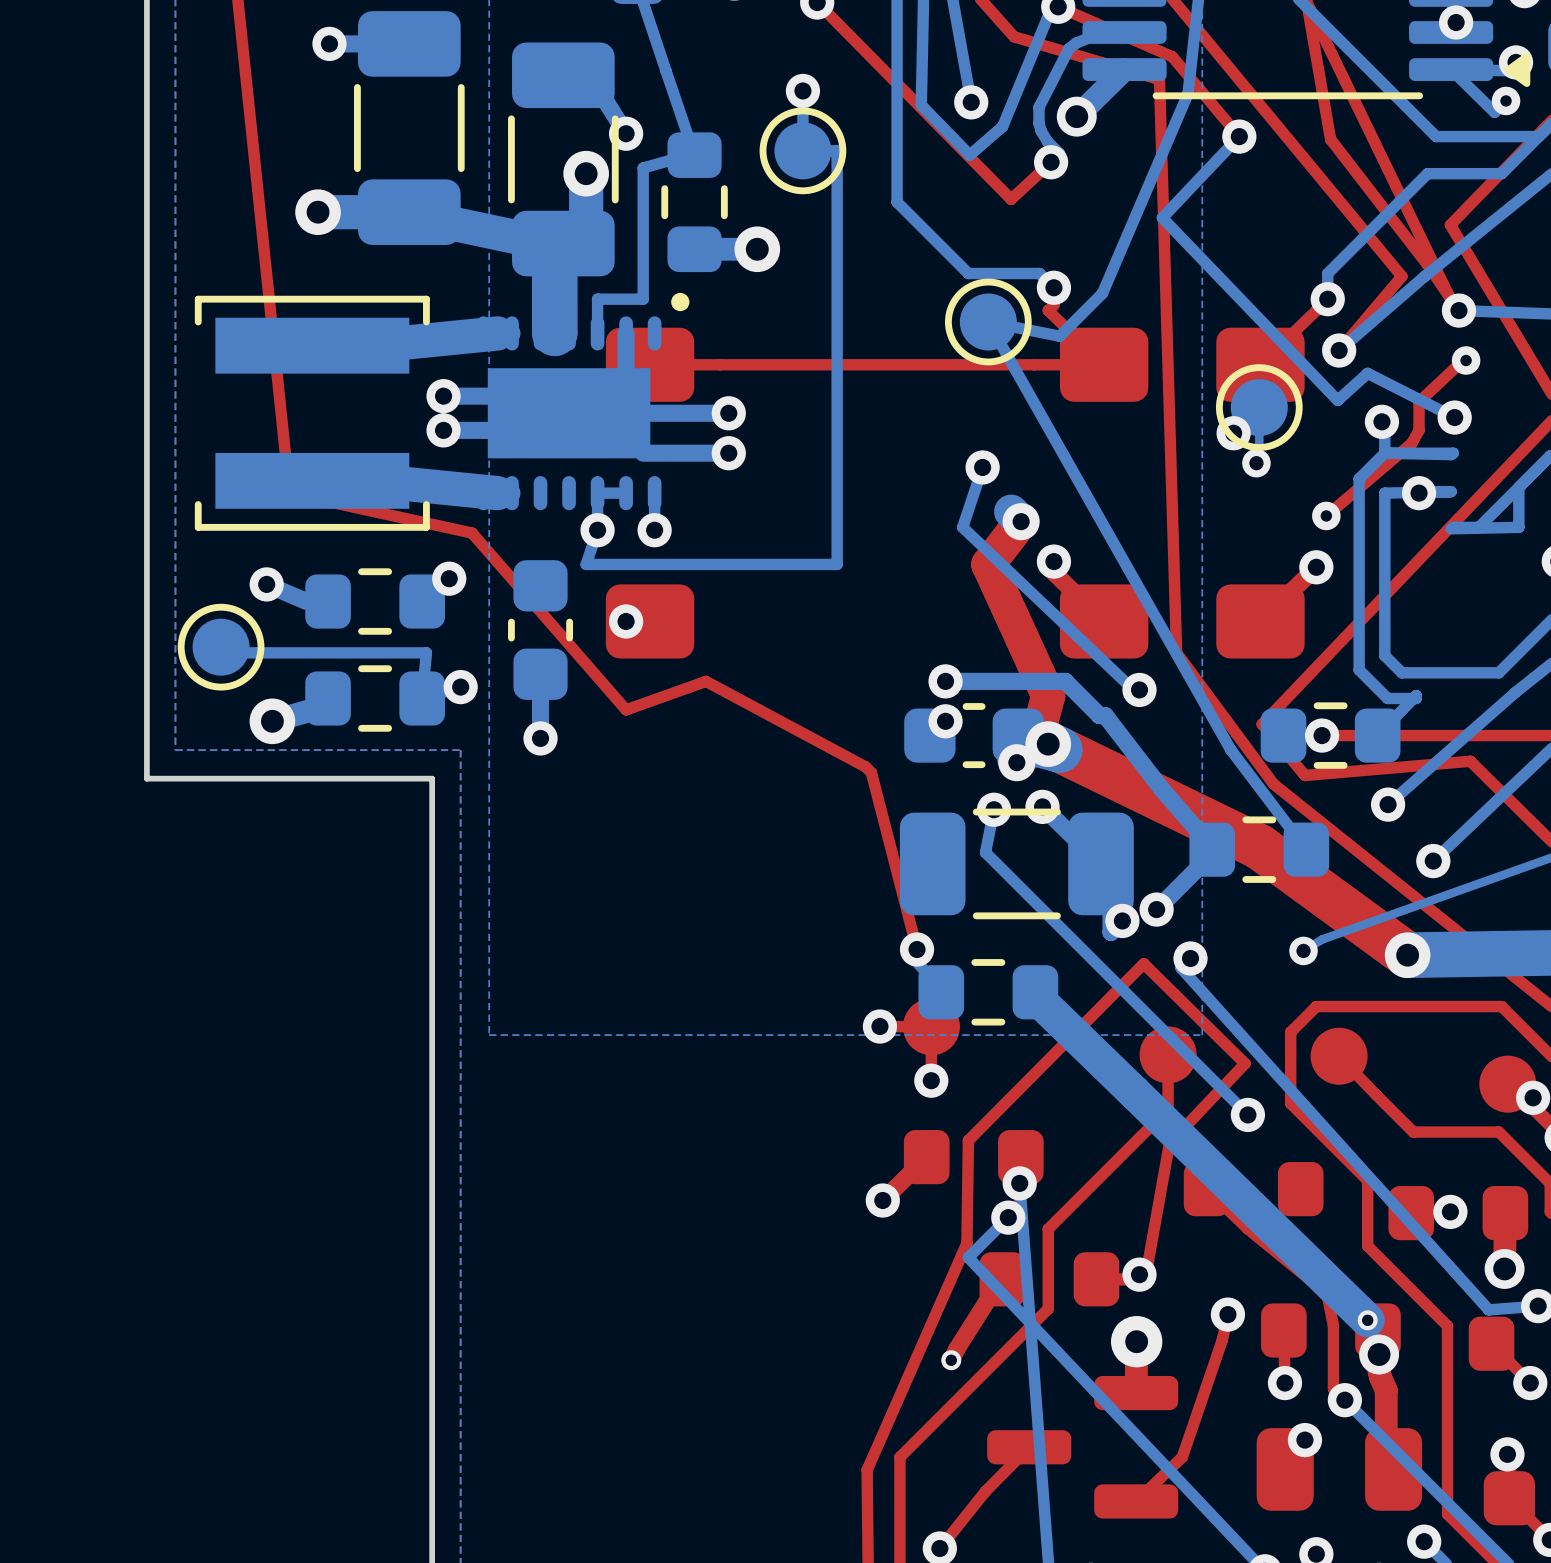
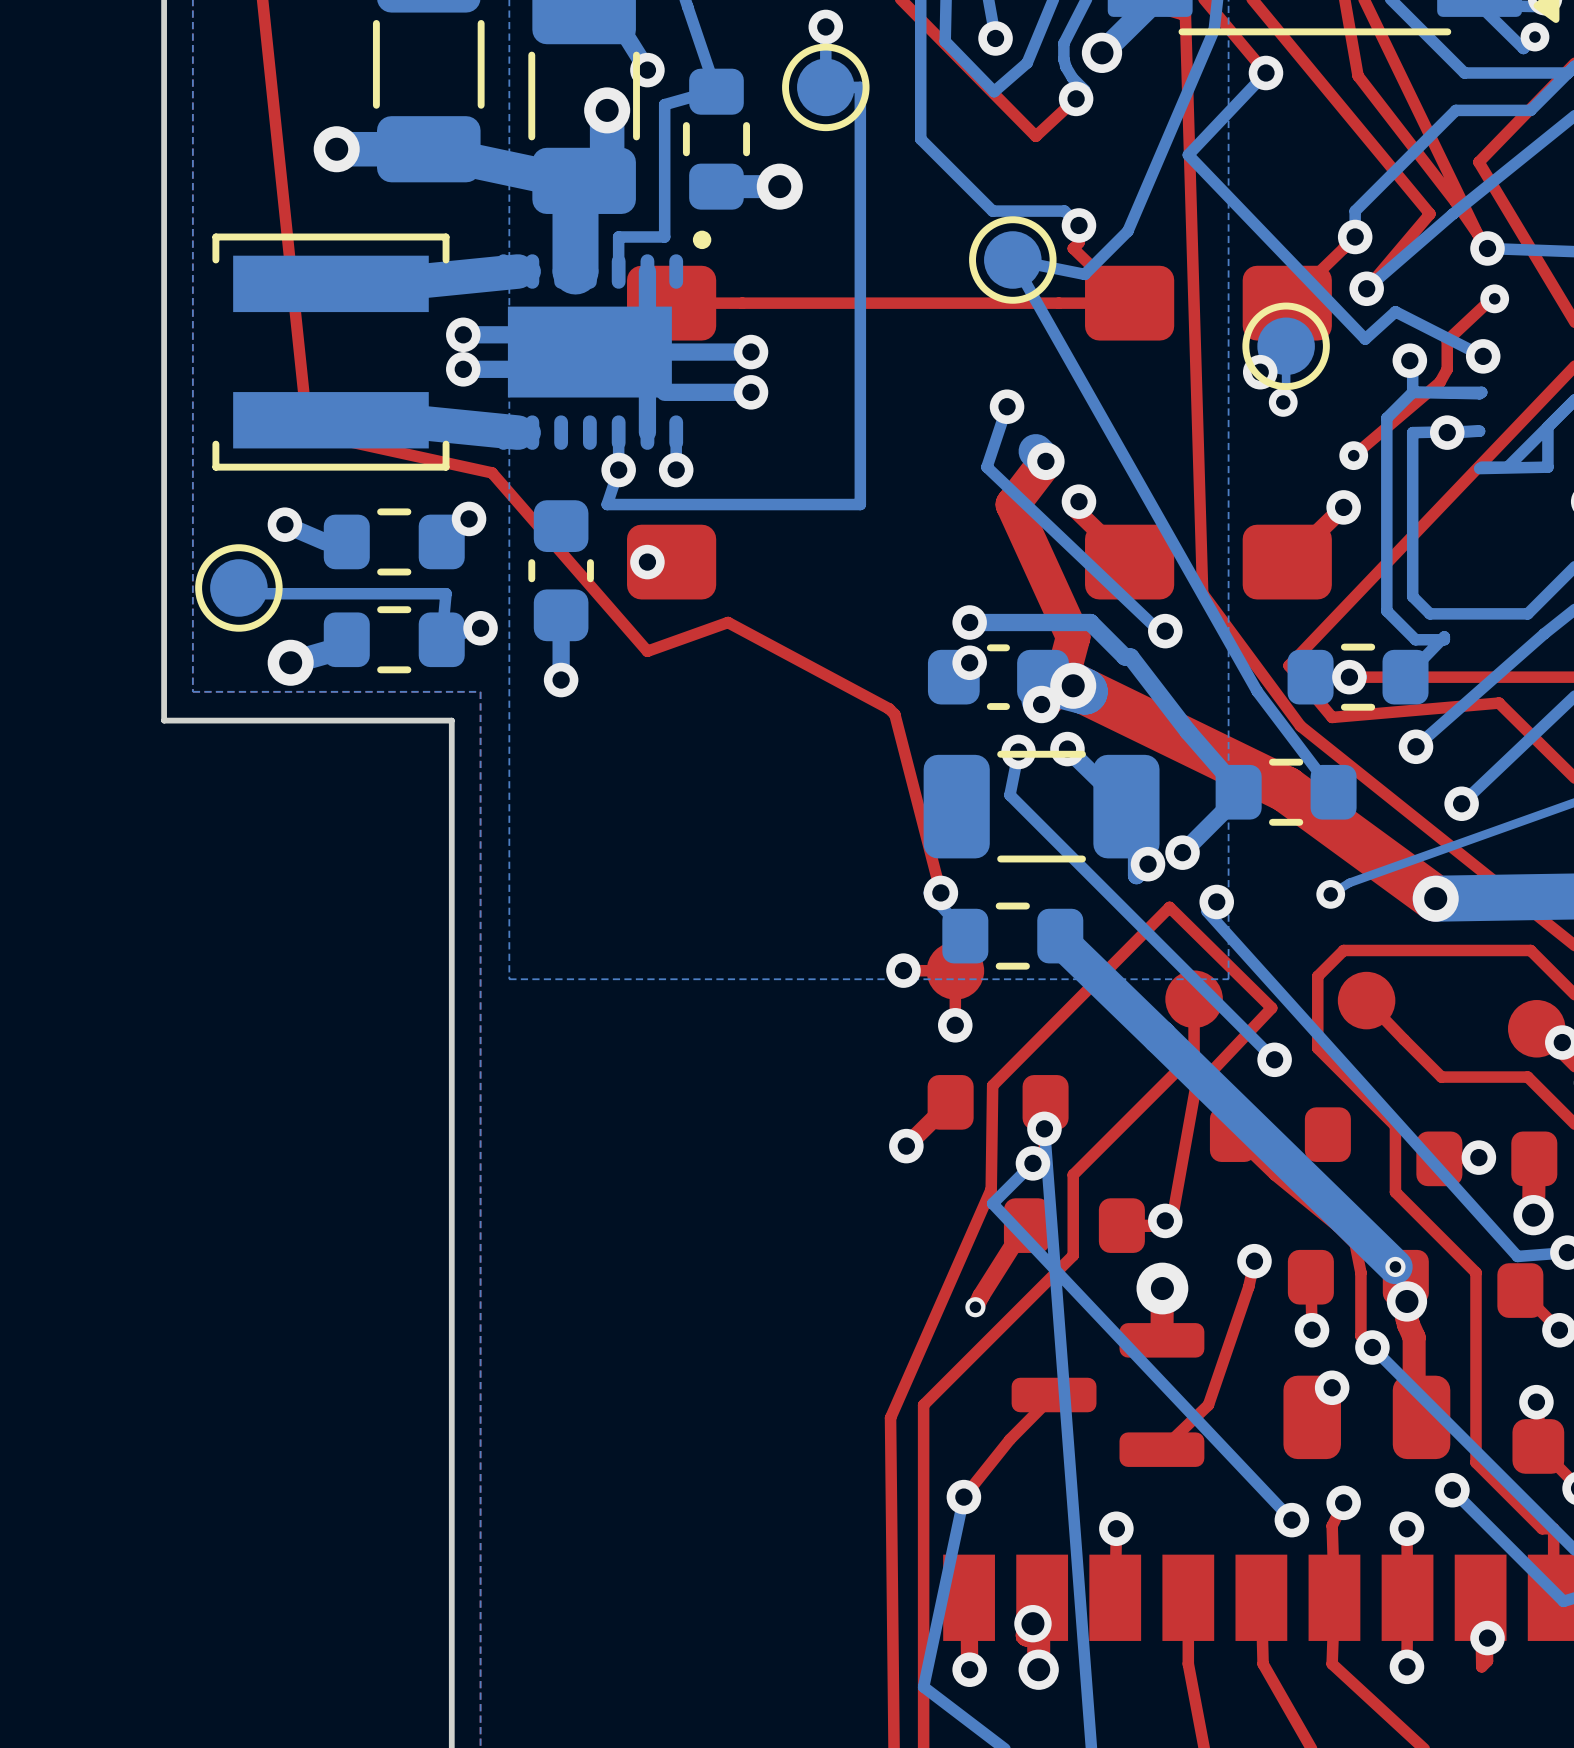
bottom track: (626, 493) (597, 493) -> (647, 432) (647, 392)

